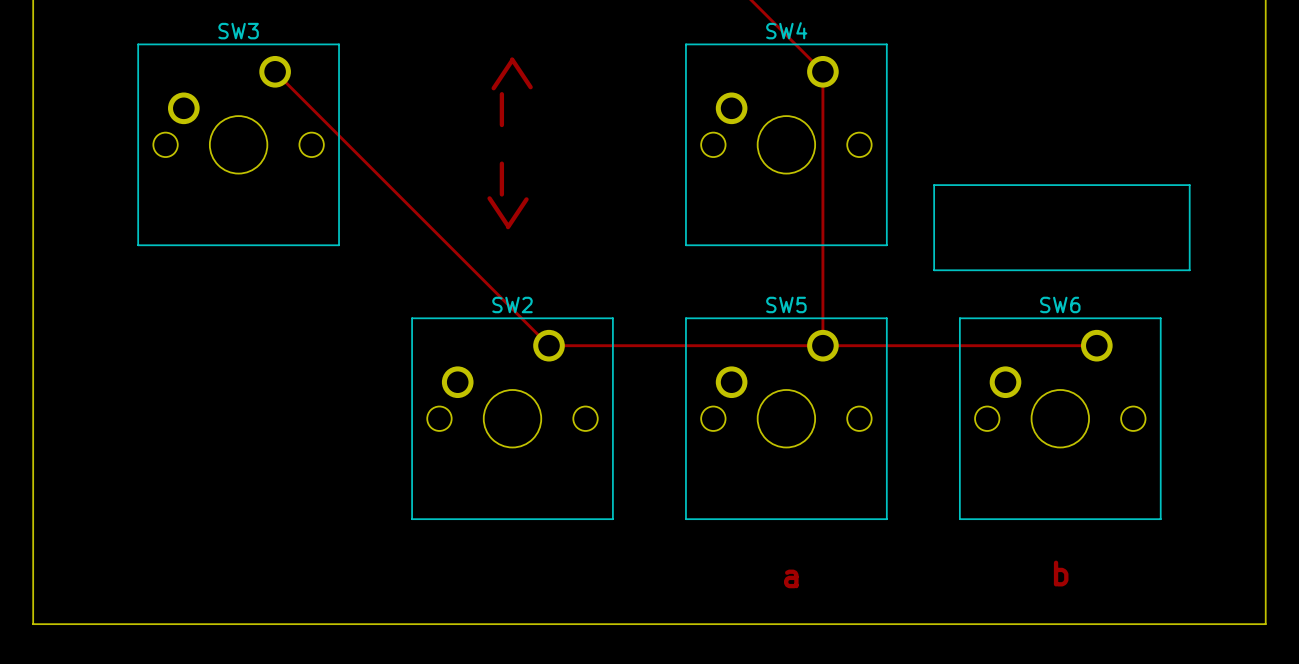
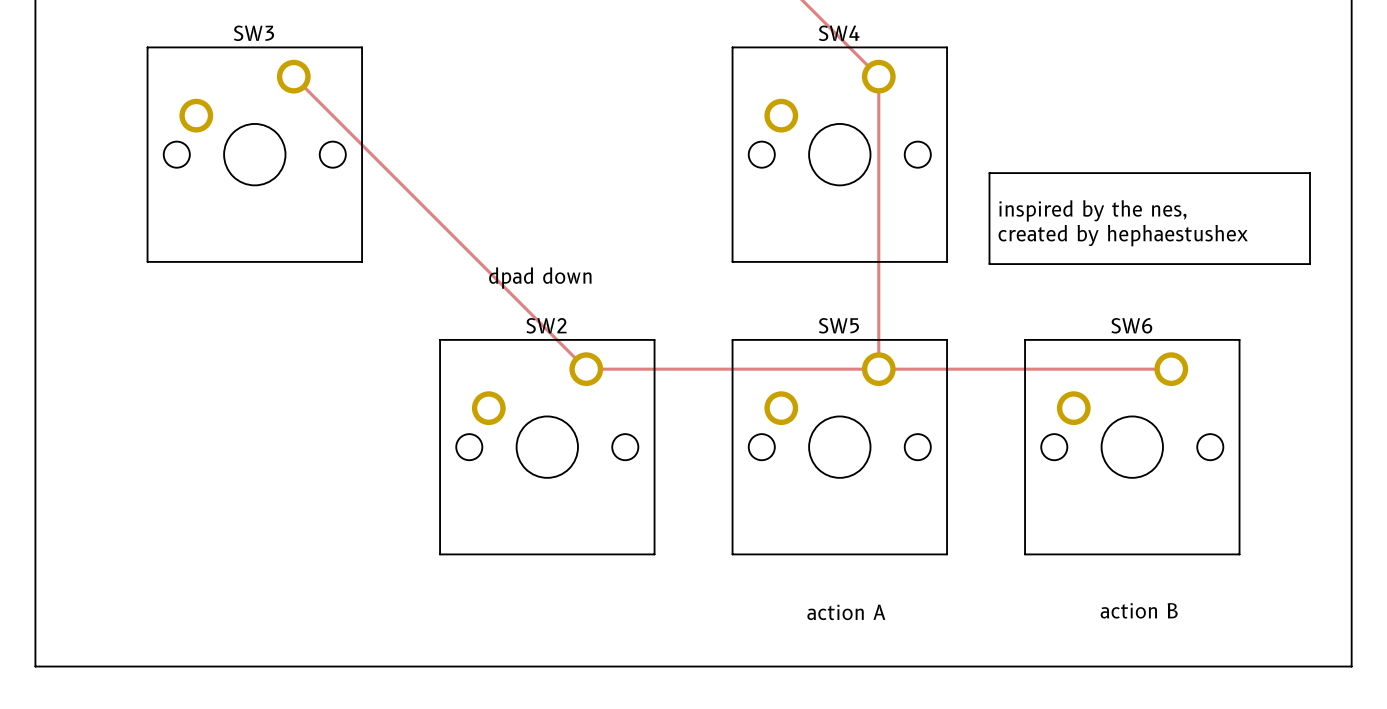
text: /\ (512, 73) -> none
text: | (501, 109) -> none
text: | (501, 179) -> none
line: (934, 185) (1189, 185) (1189, 270) (934, 270) (934, 185) -> (989, 173) (989, 264) (1310, 264) (1310, 173) (989, 173)
text: none -> inspired by the nes, (1092, 210)
text: \/ (508, 212) -> none
text: none -> created by hephaestushex (1123, 235)
text: none -> dpad down (540, 278)
text: none -> action B (1139, 610)
text: none -> action A (846, 612)
text: b (1061, 573) -> none
text: a (791, 578) -> none

